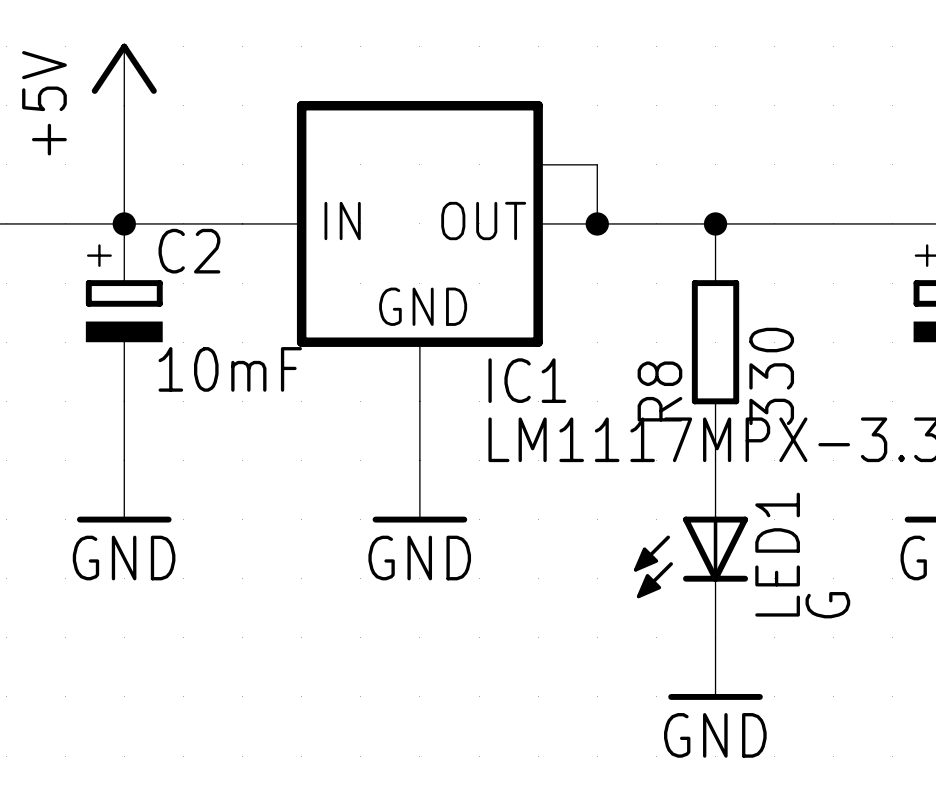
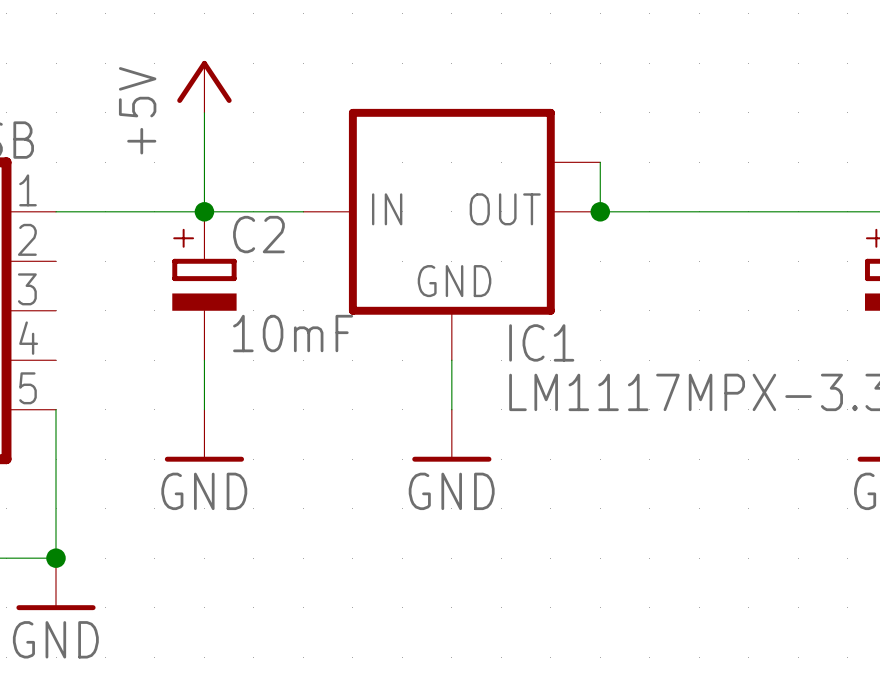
junction: (715, 223) -> none
R8: 330 (715, 342) -> none
LED1: G (690, 549) -> none
power symbol: GND (715, 668) -> none

